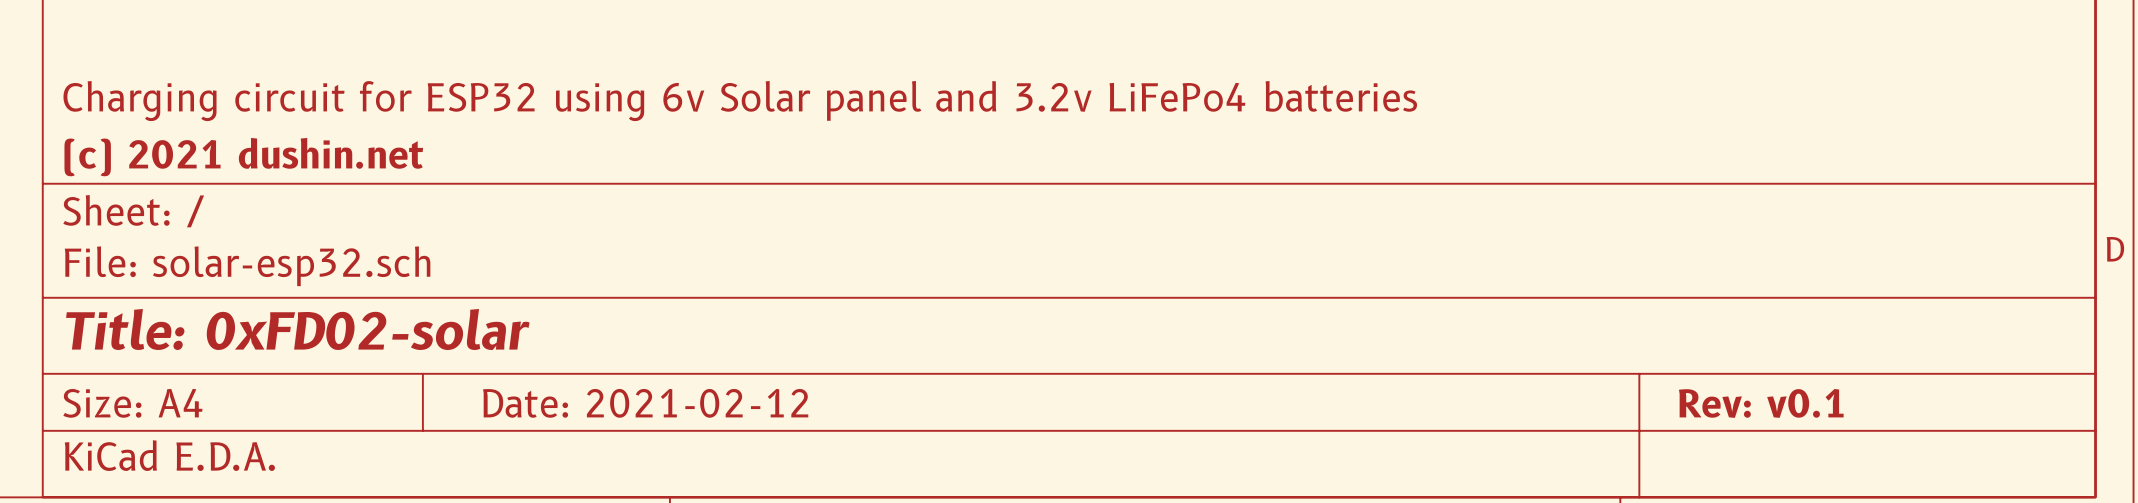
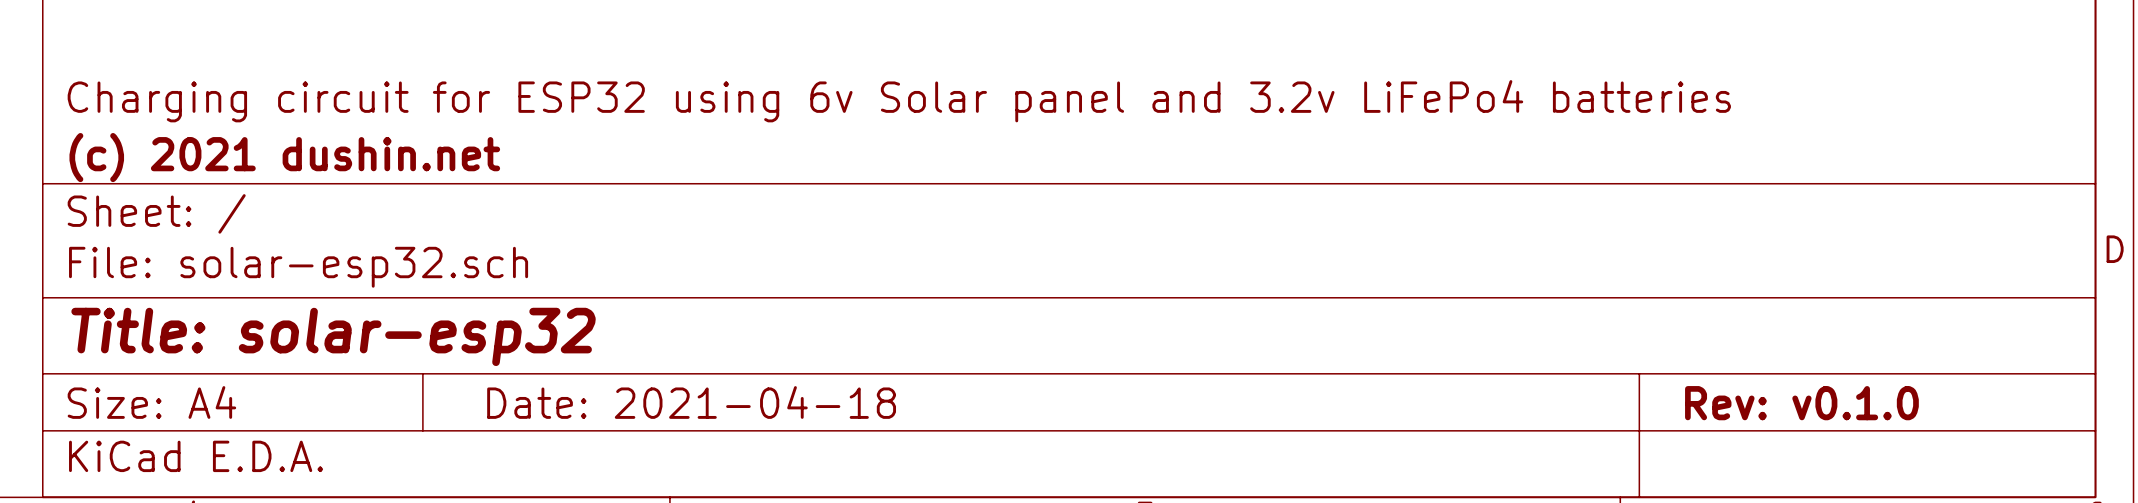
title block: Title: 0xFD02-solar (297, 329) -> Title: solar-esp32 (333, 336)
title block: Date: 2021-02-12 (645, 403) -> Date: 2021-04-18 (691, 402)
title block: Rev: v0.1 (1761, 403) -> Rev: v0.1.0 (1801, 403)

